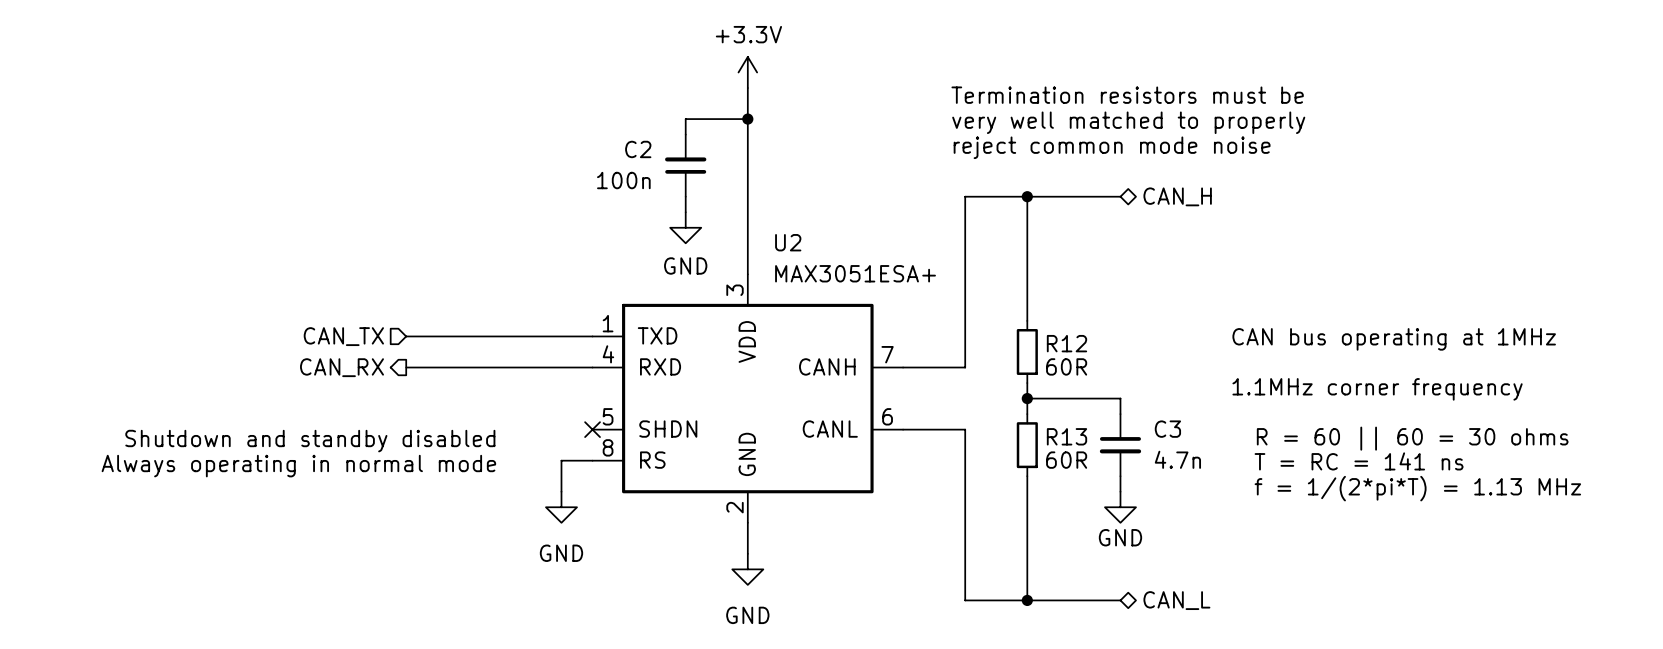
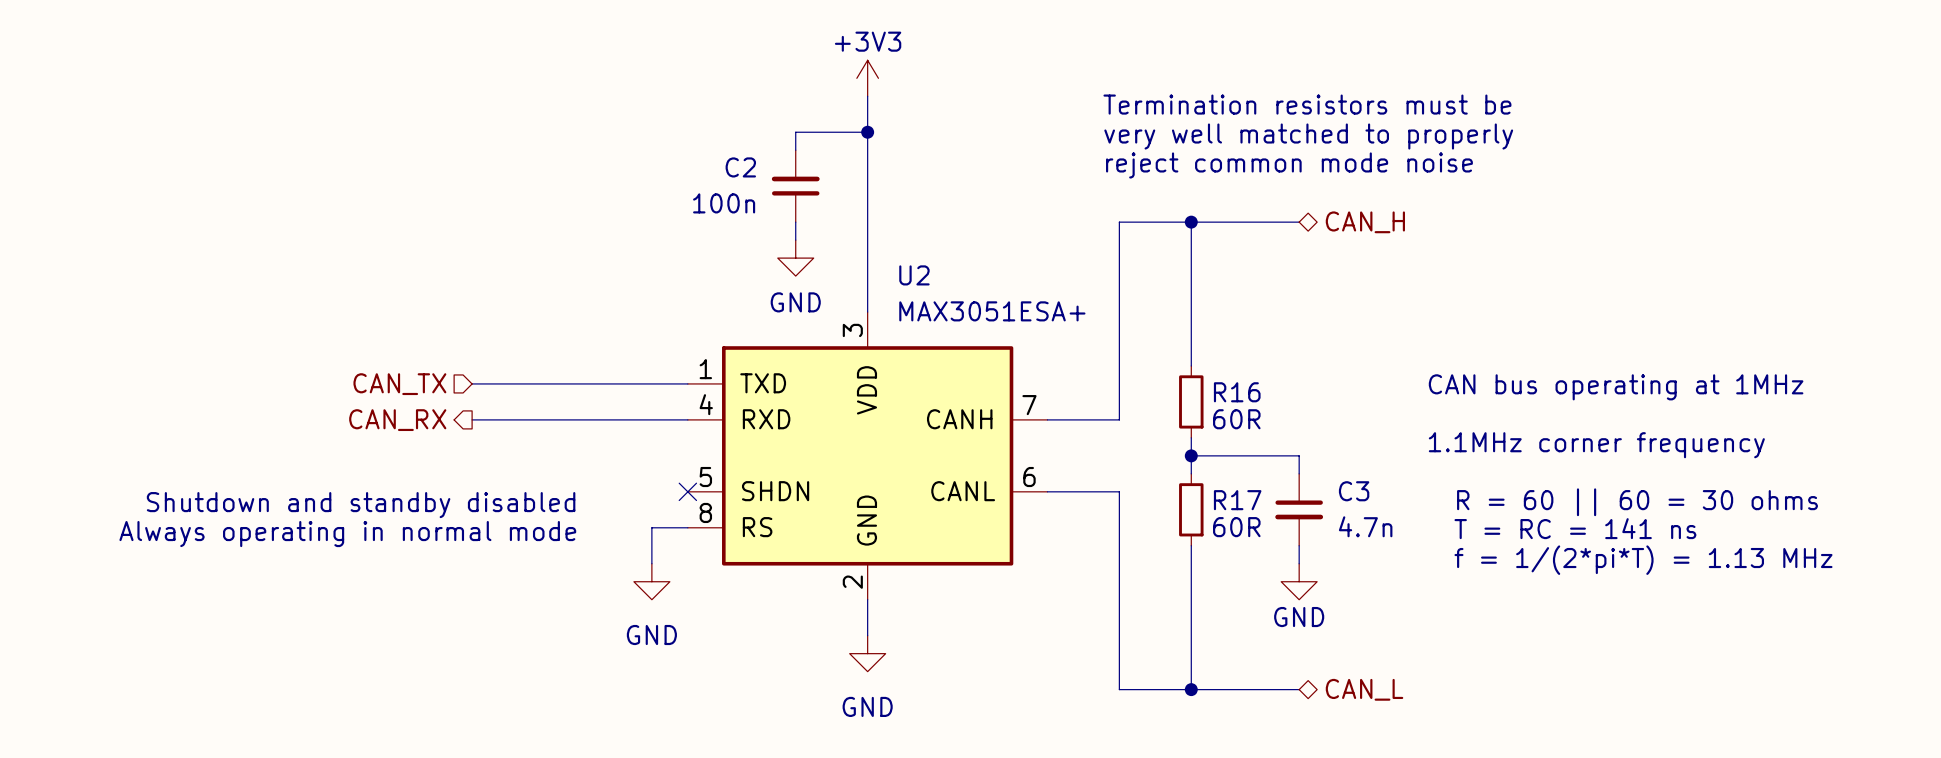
power symbol: +3.3V (747, 72) -> +3V3 (867, 78)
R12 name: R12 (1066, 343) -> R16 (1237, 392)
R13 name: R13 (1066, 436) -> R17 (1237, 500)

